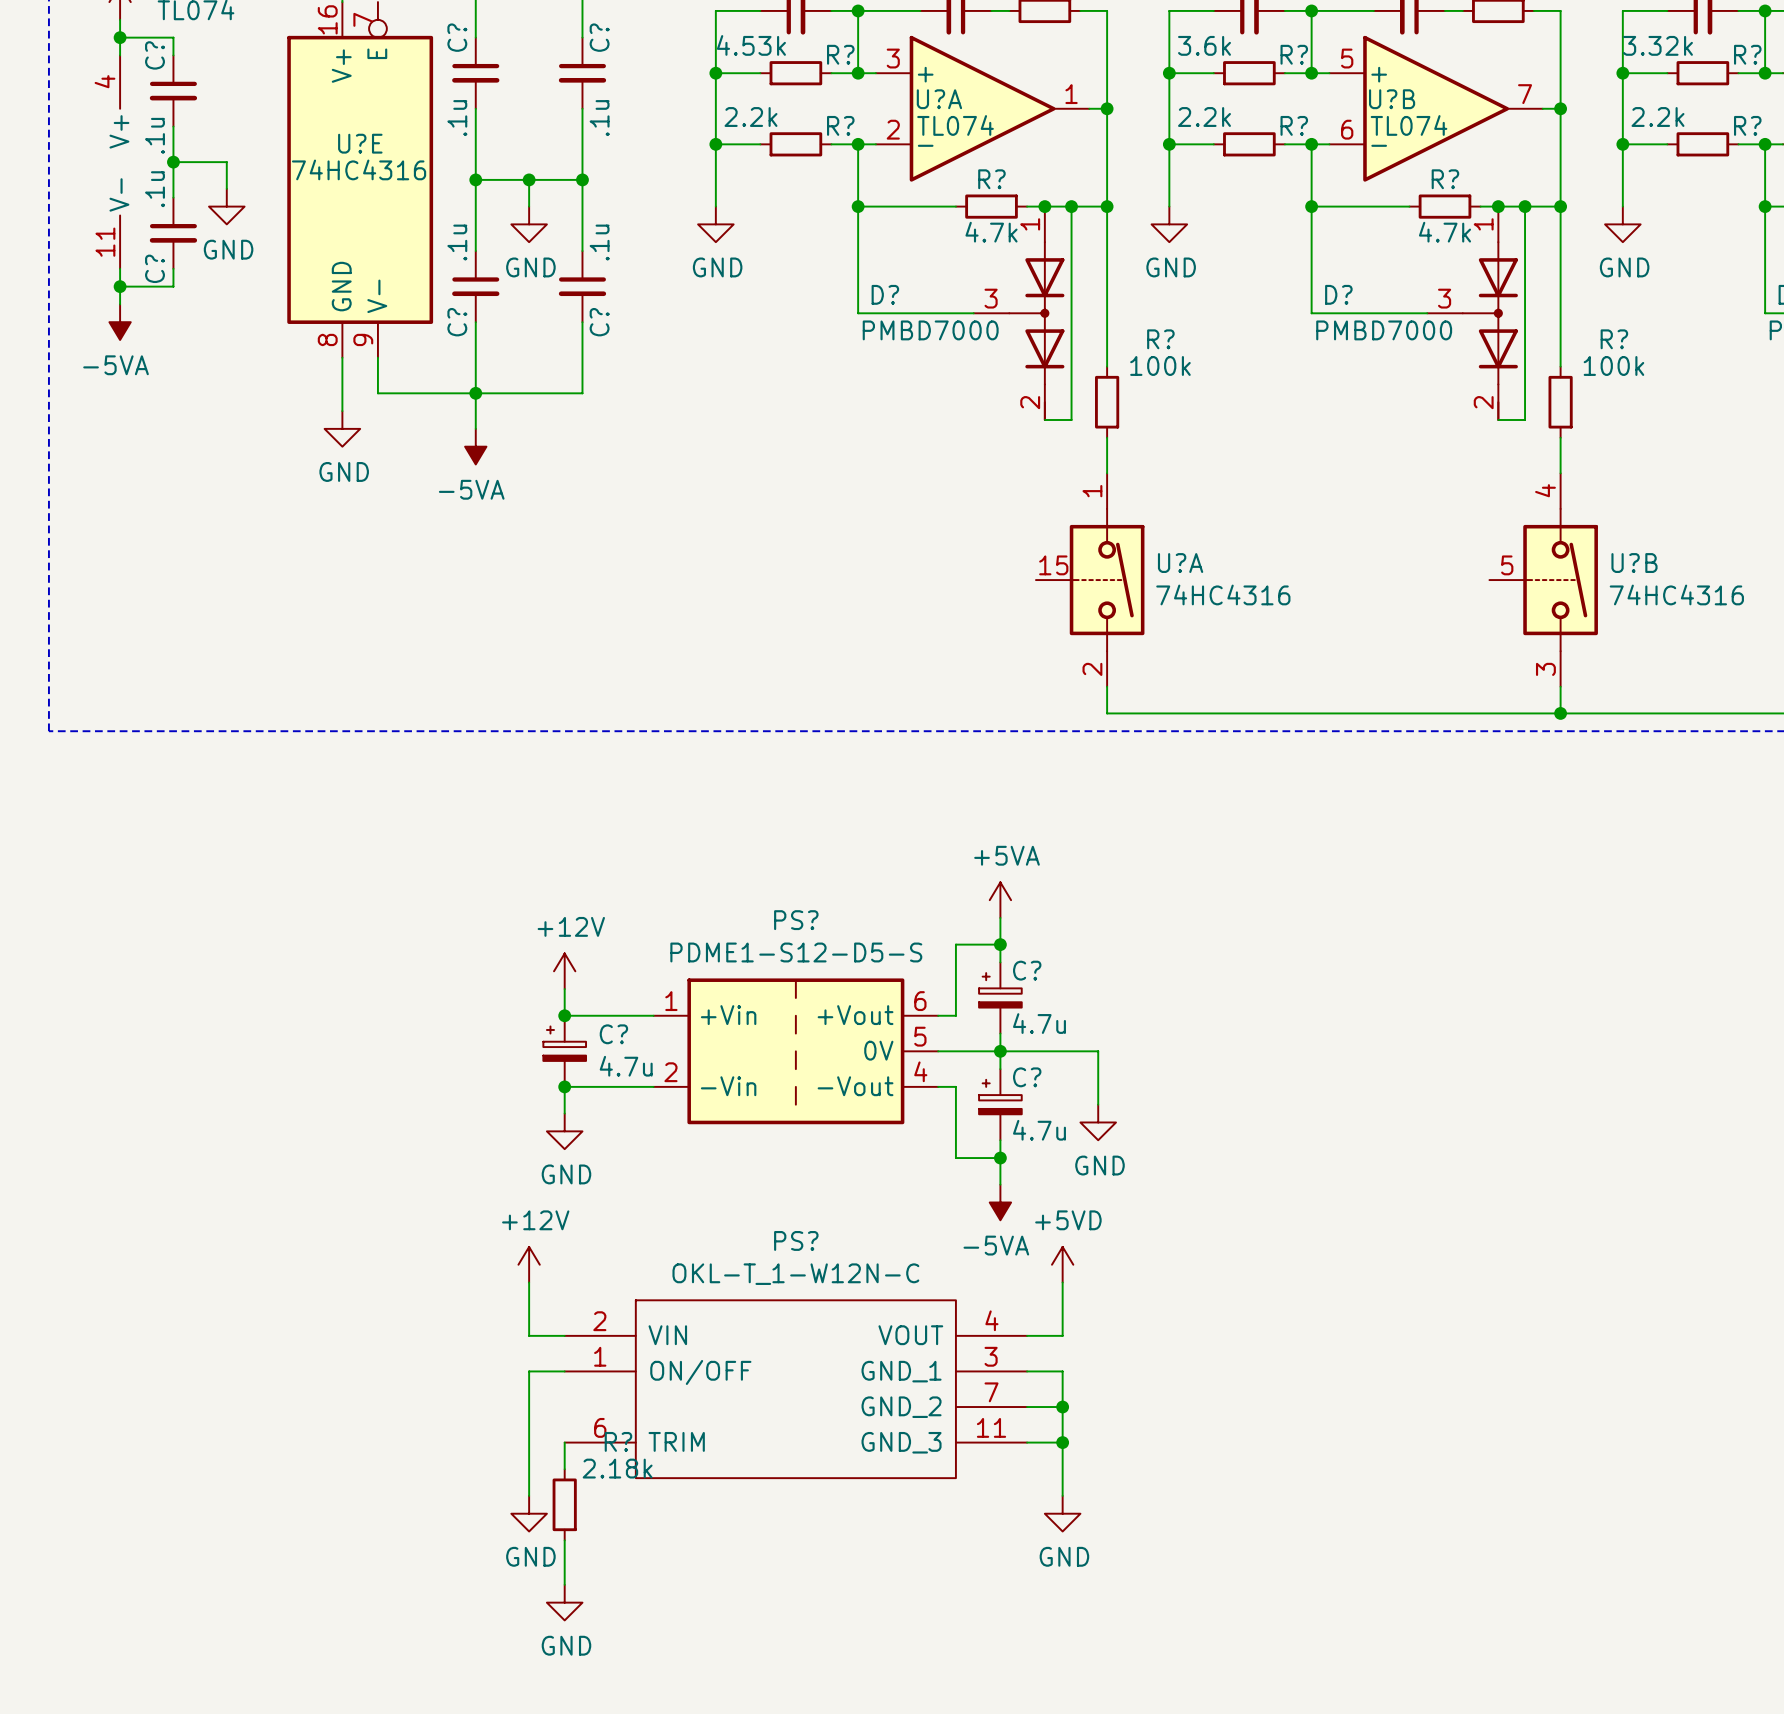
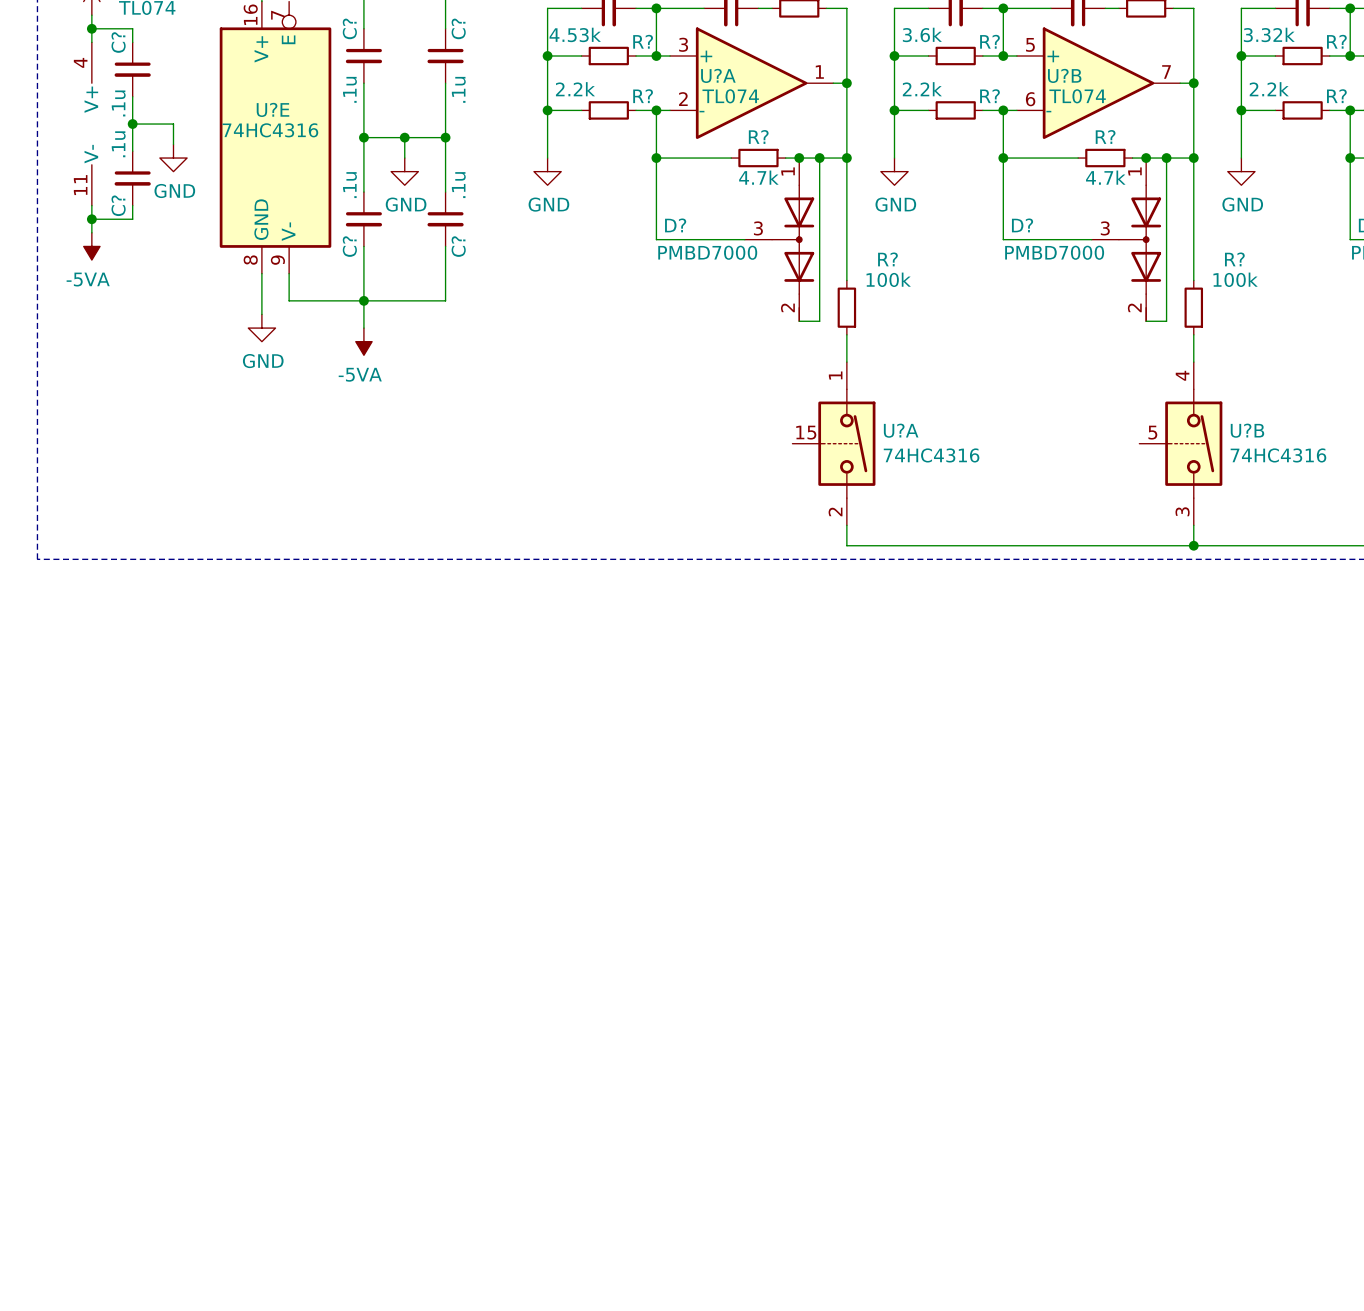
power symbol: +5VA (1000, 900) -> none
wire: (1000, 917) (1000, 962) -> none
wire: (1000, 944) (955, 944) (955, 1015) (938, 1015) -> none
junction: (1000, 944) -> none
power symbol: +12V (564, 971) -> none
wire: (564, 989) (564, 1015) (653, 1015) -> none
C?: 4.7u (1000, 997) -> none
junction: (564, 1015) -> none
wire: (1000, 1033) (1000, 1069) -> none
C?: 4.7u (564, 1051) -> none
PS?: PDME1-S12-D5-S (795, 1051) -> none
wire: (938, 1051) (1098, 1051) (1098, 1104) -> none
junction: (1000, 1051) -> none
junction: (564, 1086) -> none
wire: (653, 1086) (564, 1086) (564, 1113) -> none
wire: (938, 1086) (955, 1086) (955, 1158) (1000, 1158) -> none
C?: 4.7u (1000, 1104) -> none
power symbol: GND (1098, 1122) -> none
power symbol: GND (564, 1131) -> none
wire: (1000, 1140) (1000, 1184) -> none
junction: (1000, 1158) -> none
power symbol: -5VA (1000, 1202) -> none
power symbol: +12V (529, 1264) -> none
power symbol: +5VD (1062, 1264) -> none
wire: (529, 1282) (529, 1335) (564, 1335) -> none
wire: (1062, 1282) (1062, 1335) (1027, 1335) -> none
wire: (564, 1371) (529, 1371) (529, 1495) -> none
wire: (1027, 1371) (1062, 1371) (1062, 1495) -> none
PS?: OKL-T_1-W12N-C (795, 1389) -> none
wire: (1027, 1407) (1062, 1407) -> none
junction: (1062, 1407) -> none
wire: (564, 1442) (564, 1469) -> none
wire: (1027, 1442) (1062, 1442) -> none
junction: (1062, 1442) -> none
R?: 2.18k (564, 1504) -> none
power symbol: GND (529, 1513) -> none
power symbol: GND (1062, 1513) -> none
wire: (564, 1540) (564, 1584) -> none
power symbol: GND (564, 1602) -> none

